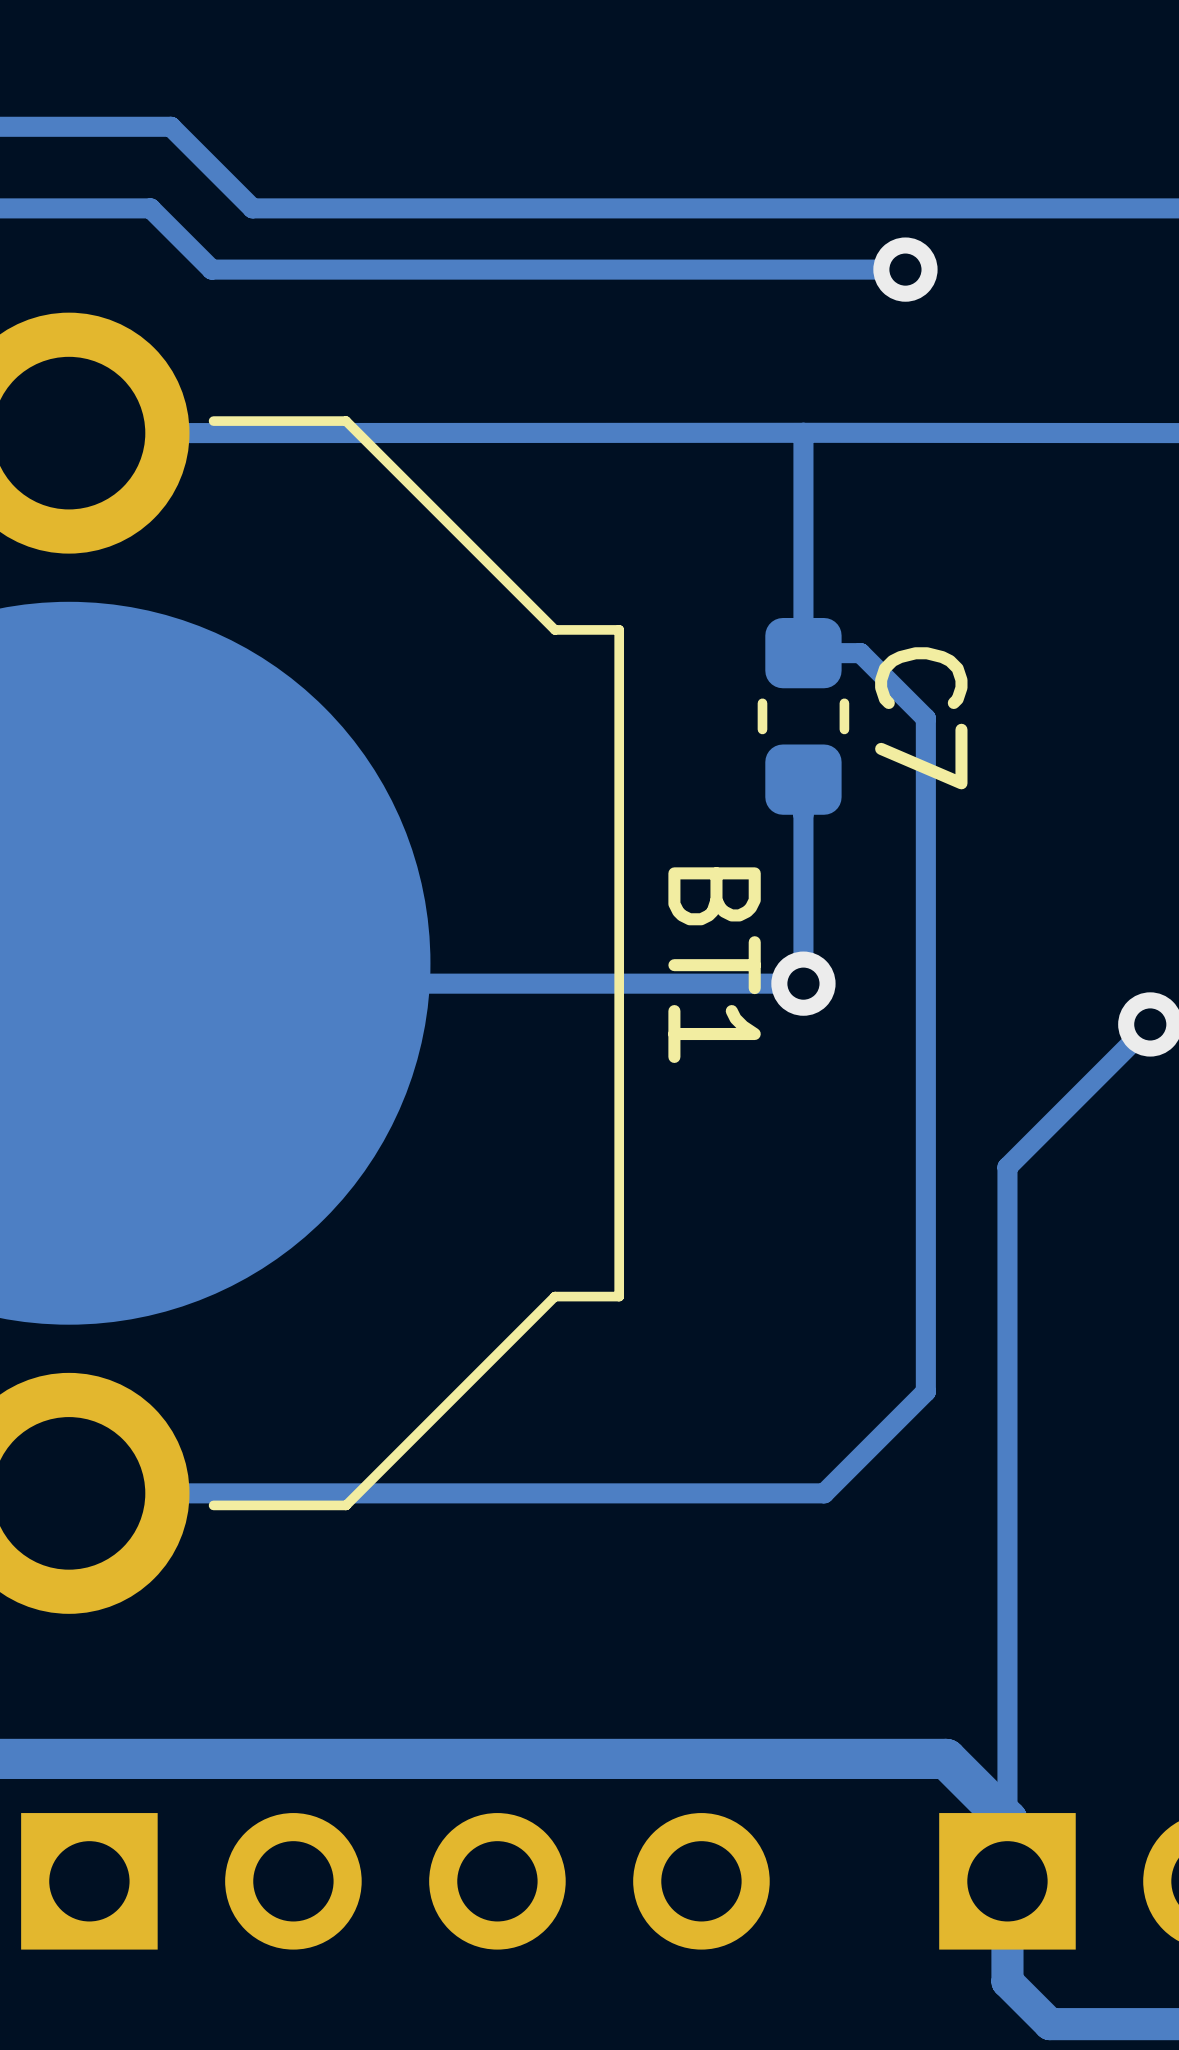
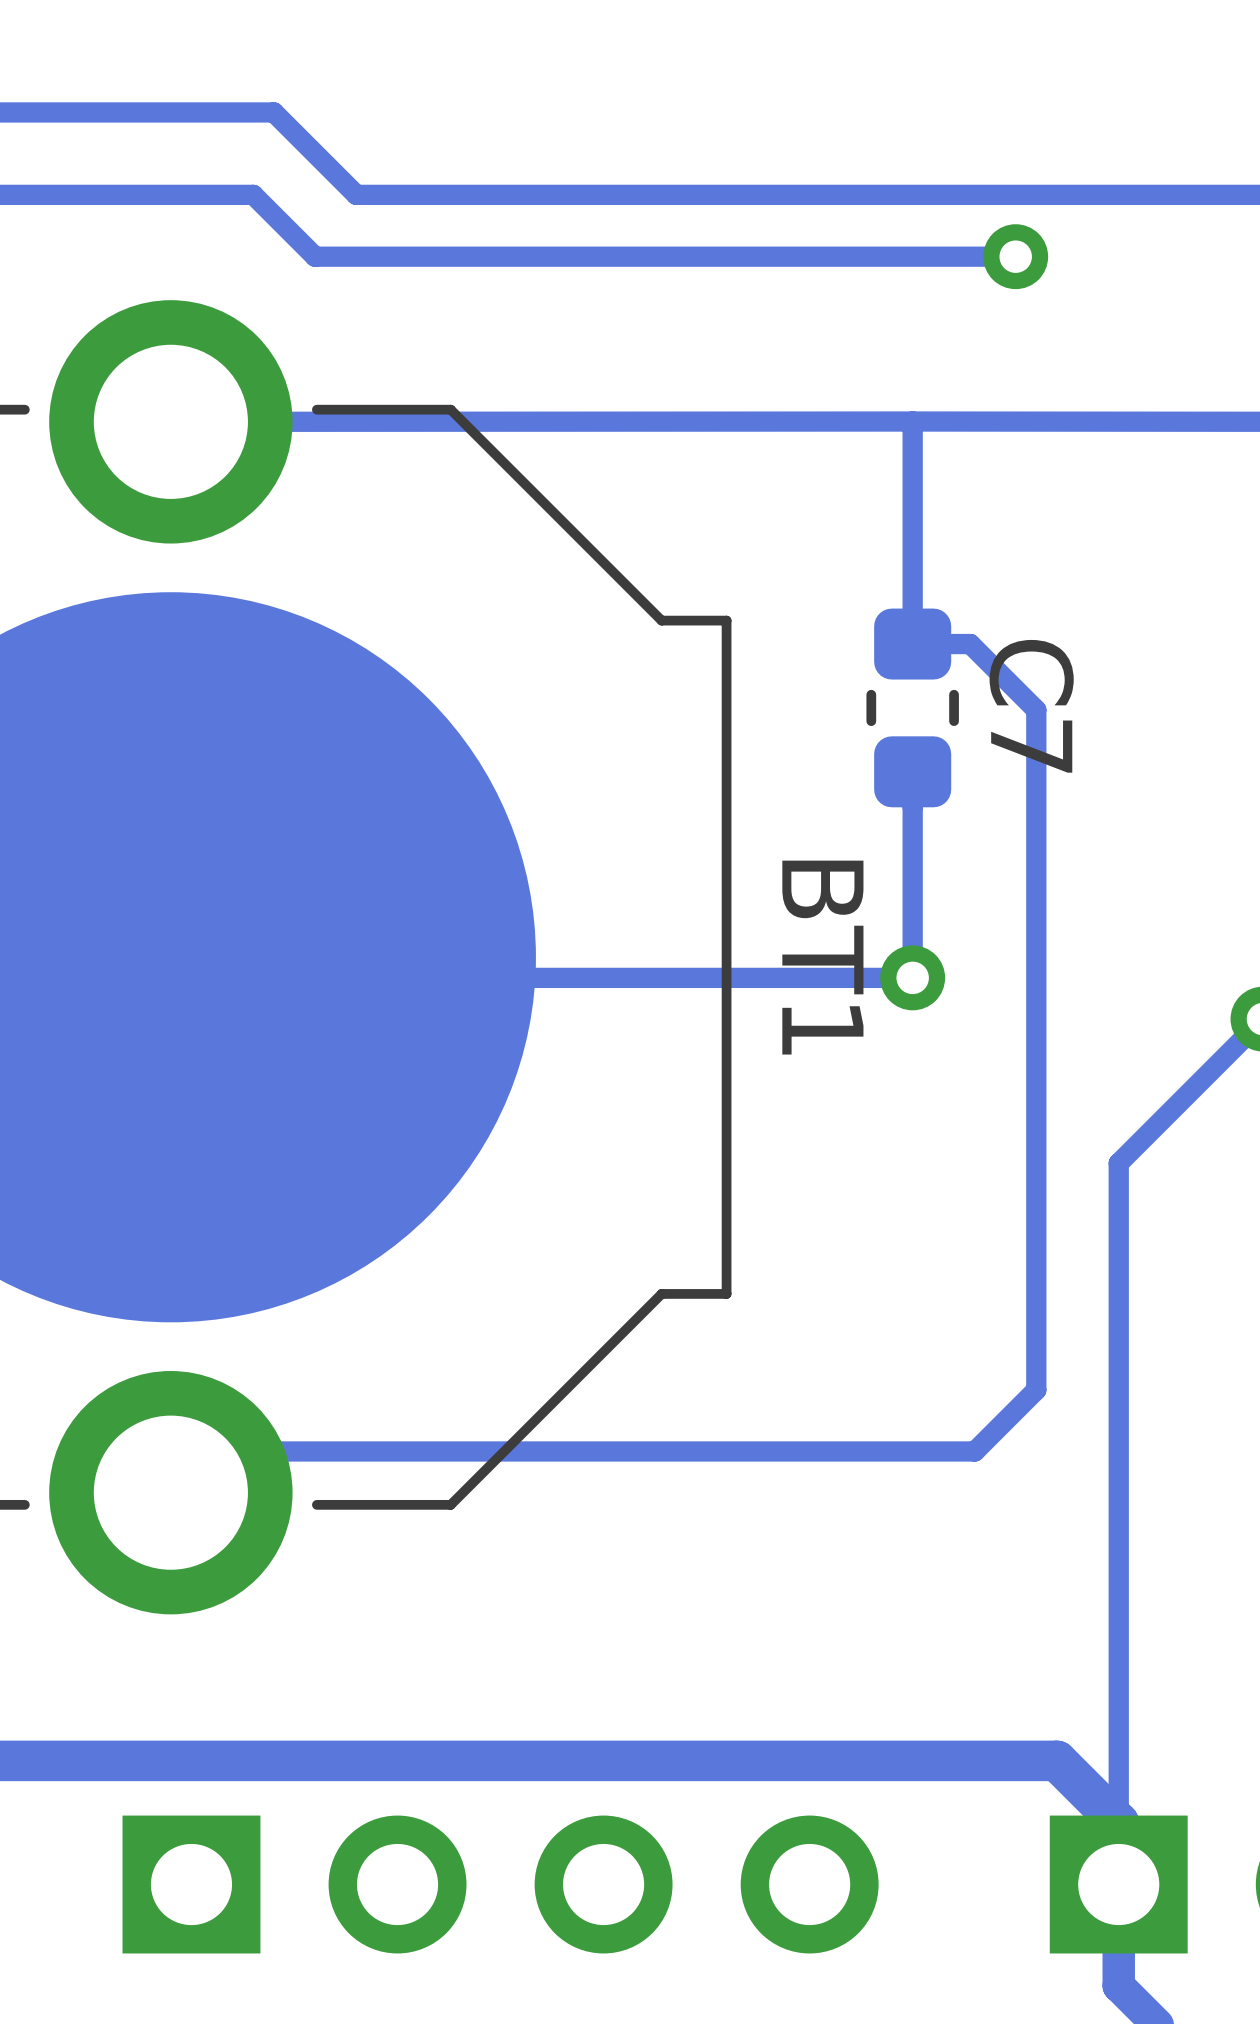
track: (864, 1452) (824, 1493) (69, 1493) -> (974, 1451) (170, 1451)

